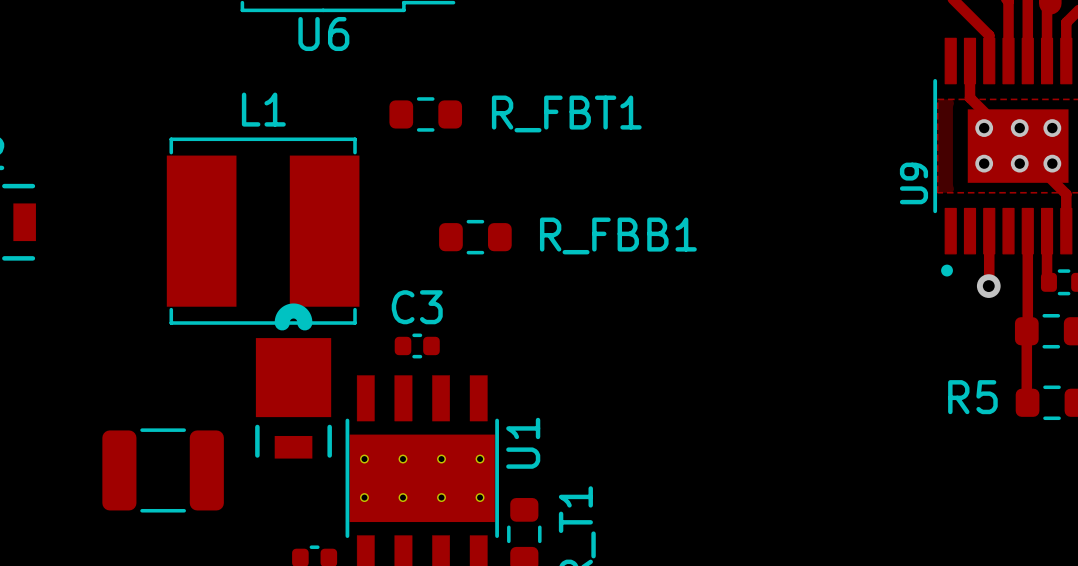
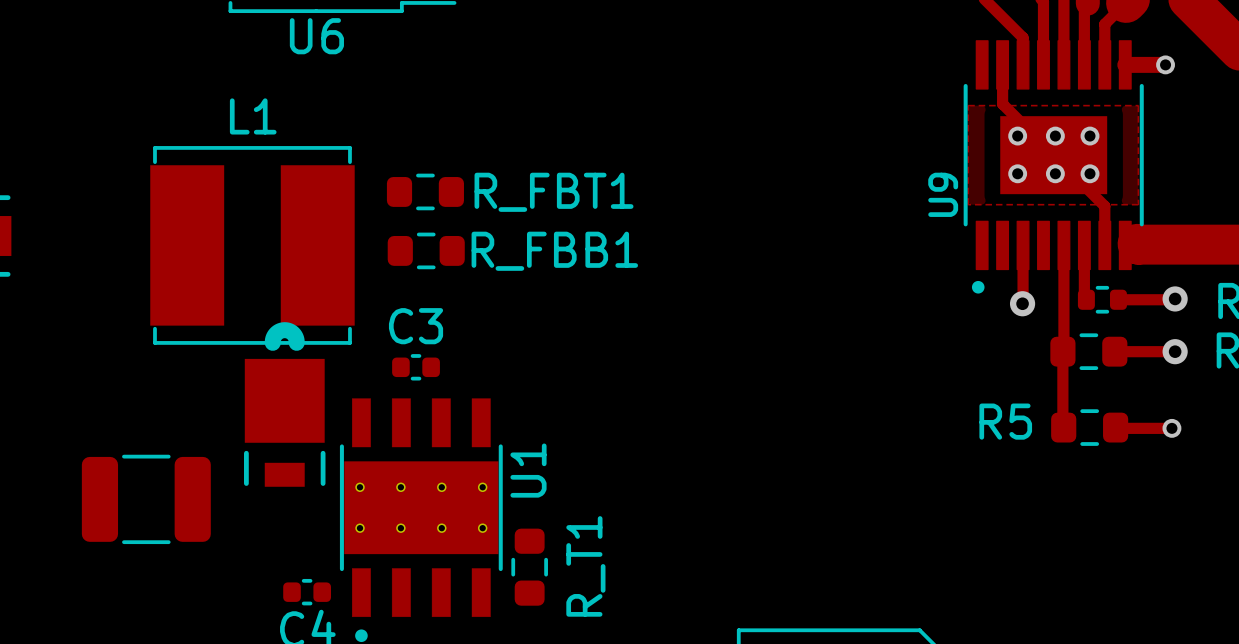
R_FBT1 name position: R_FBT1 (566, 113) -> R_FBT1 (554, 192)
R_FBT1 position: (425, 114) -> (425, 191)
R_FBB1 name position: R_FBB1 (618, 235) -> R_FBB1 (554, 251)
R_FBB1 position: (475, 237) -> (426, 250)

